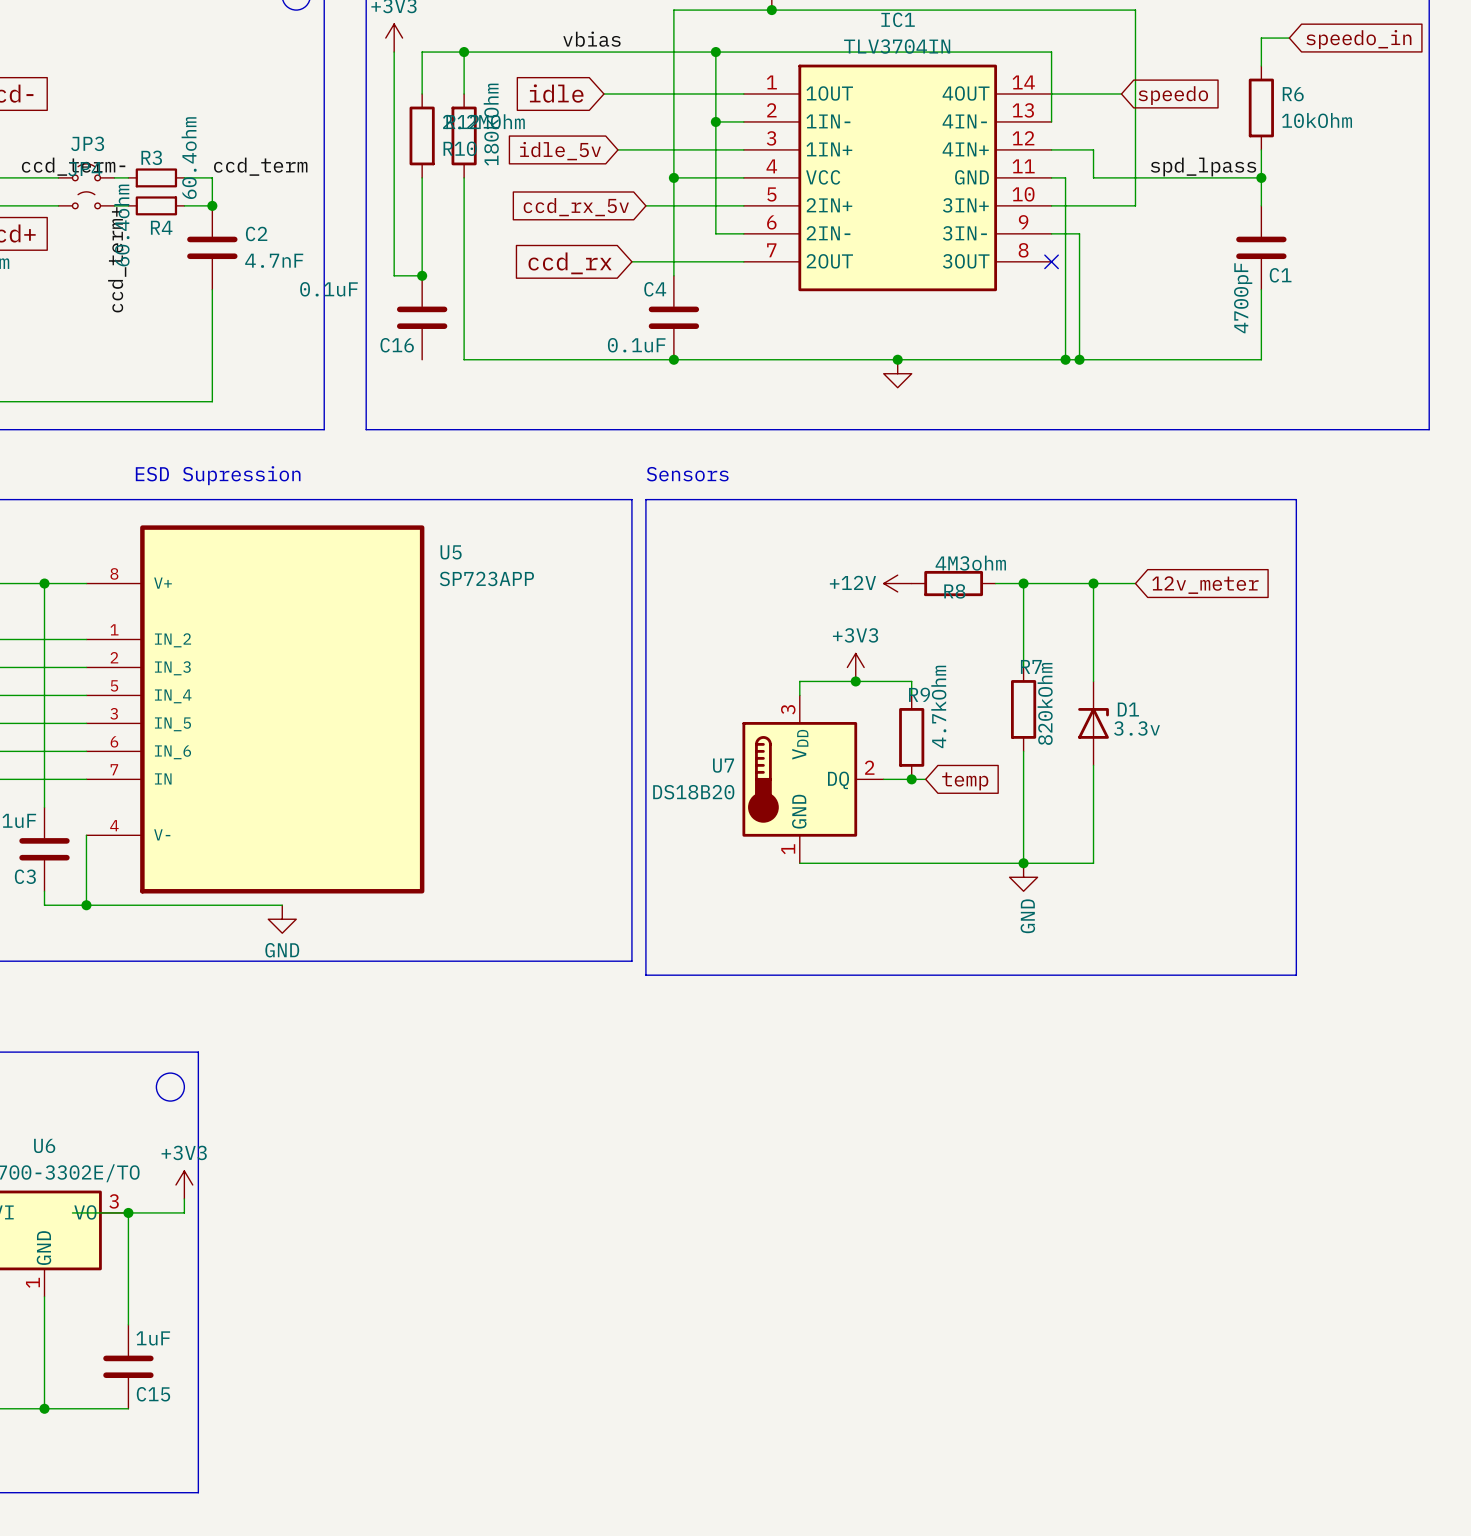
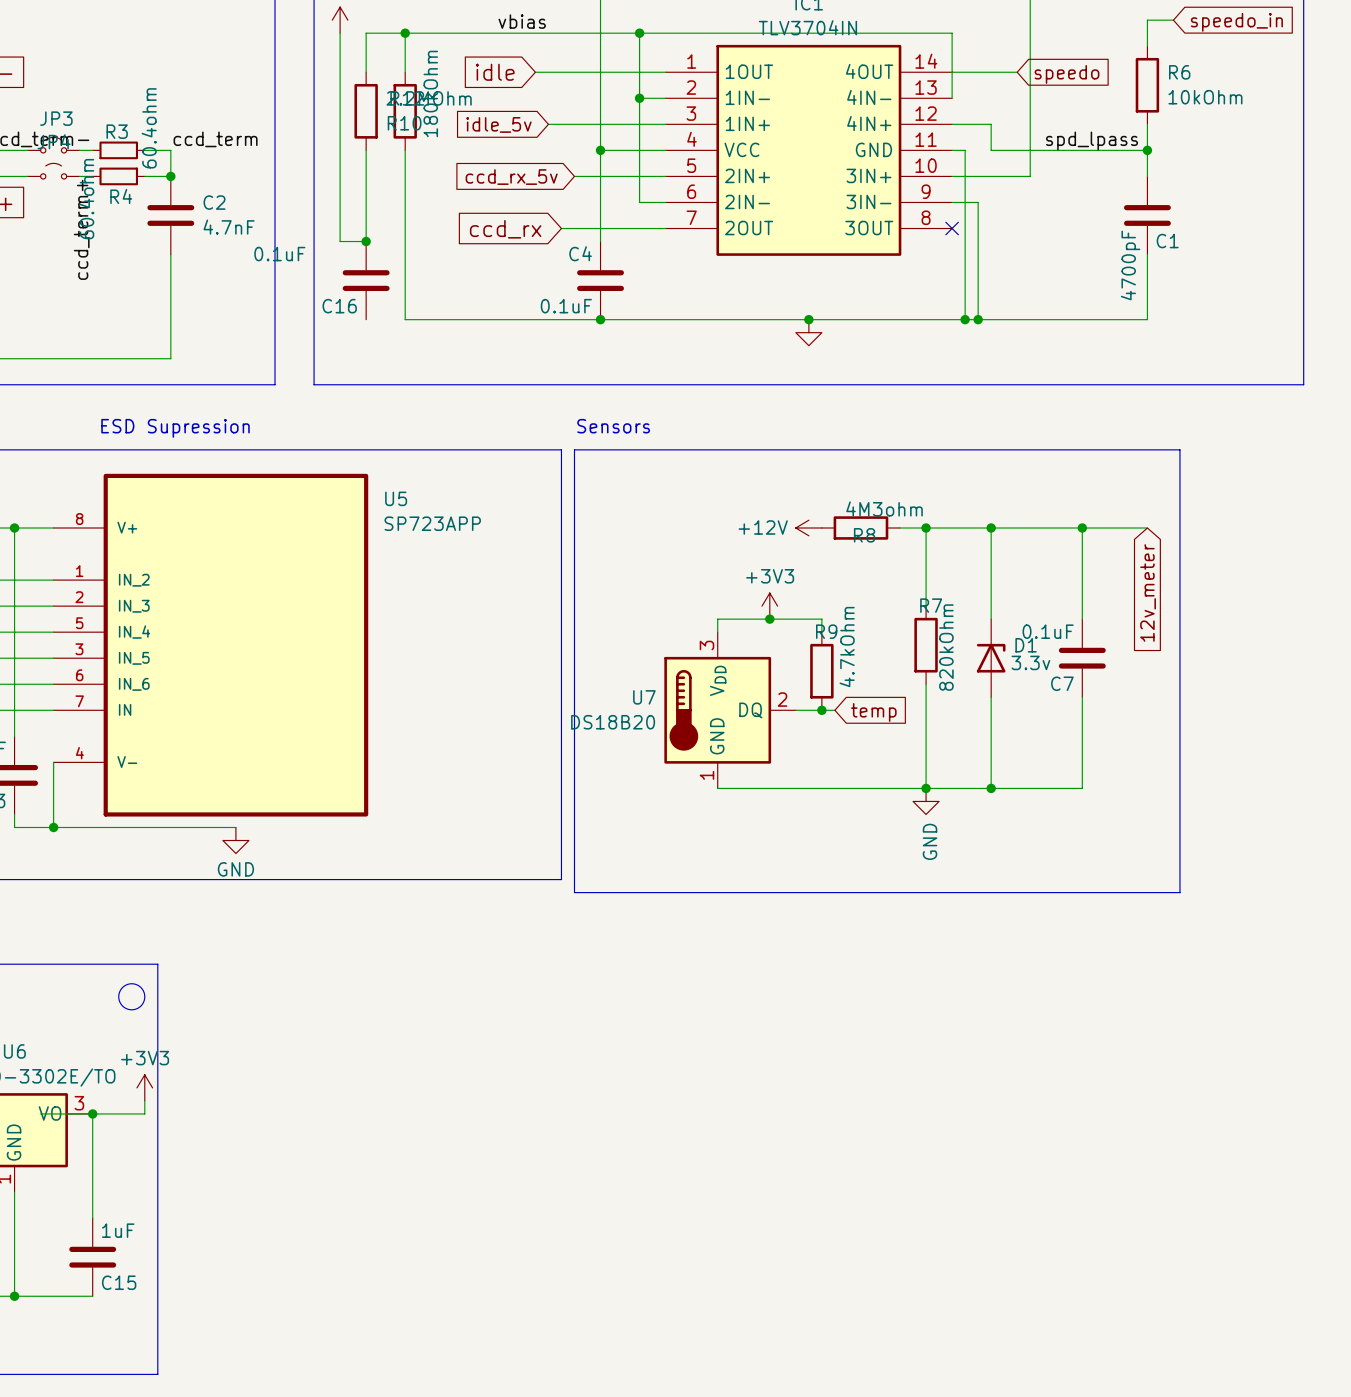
wire: none -> (1030, 528) (1147, 528)
wire: none -> (1082, 528) (1082, 619)
junction: none -> (1082, 528)
global label rotation: 0° (1205, 585) -> 90° clockwise (1148, 592)
C7: none -> 0.1uF (1082, 658)
wire: none -> (1082, 697) (1082, 788) (991, 788)
junction: none -> (991, 788)

